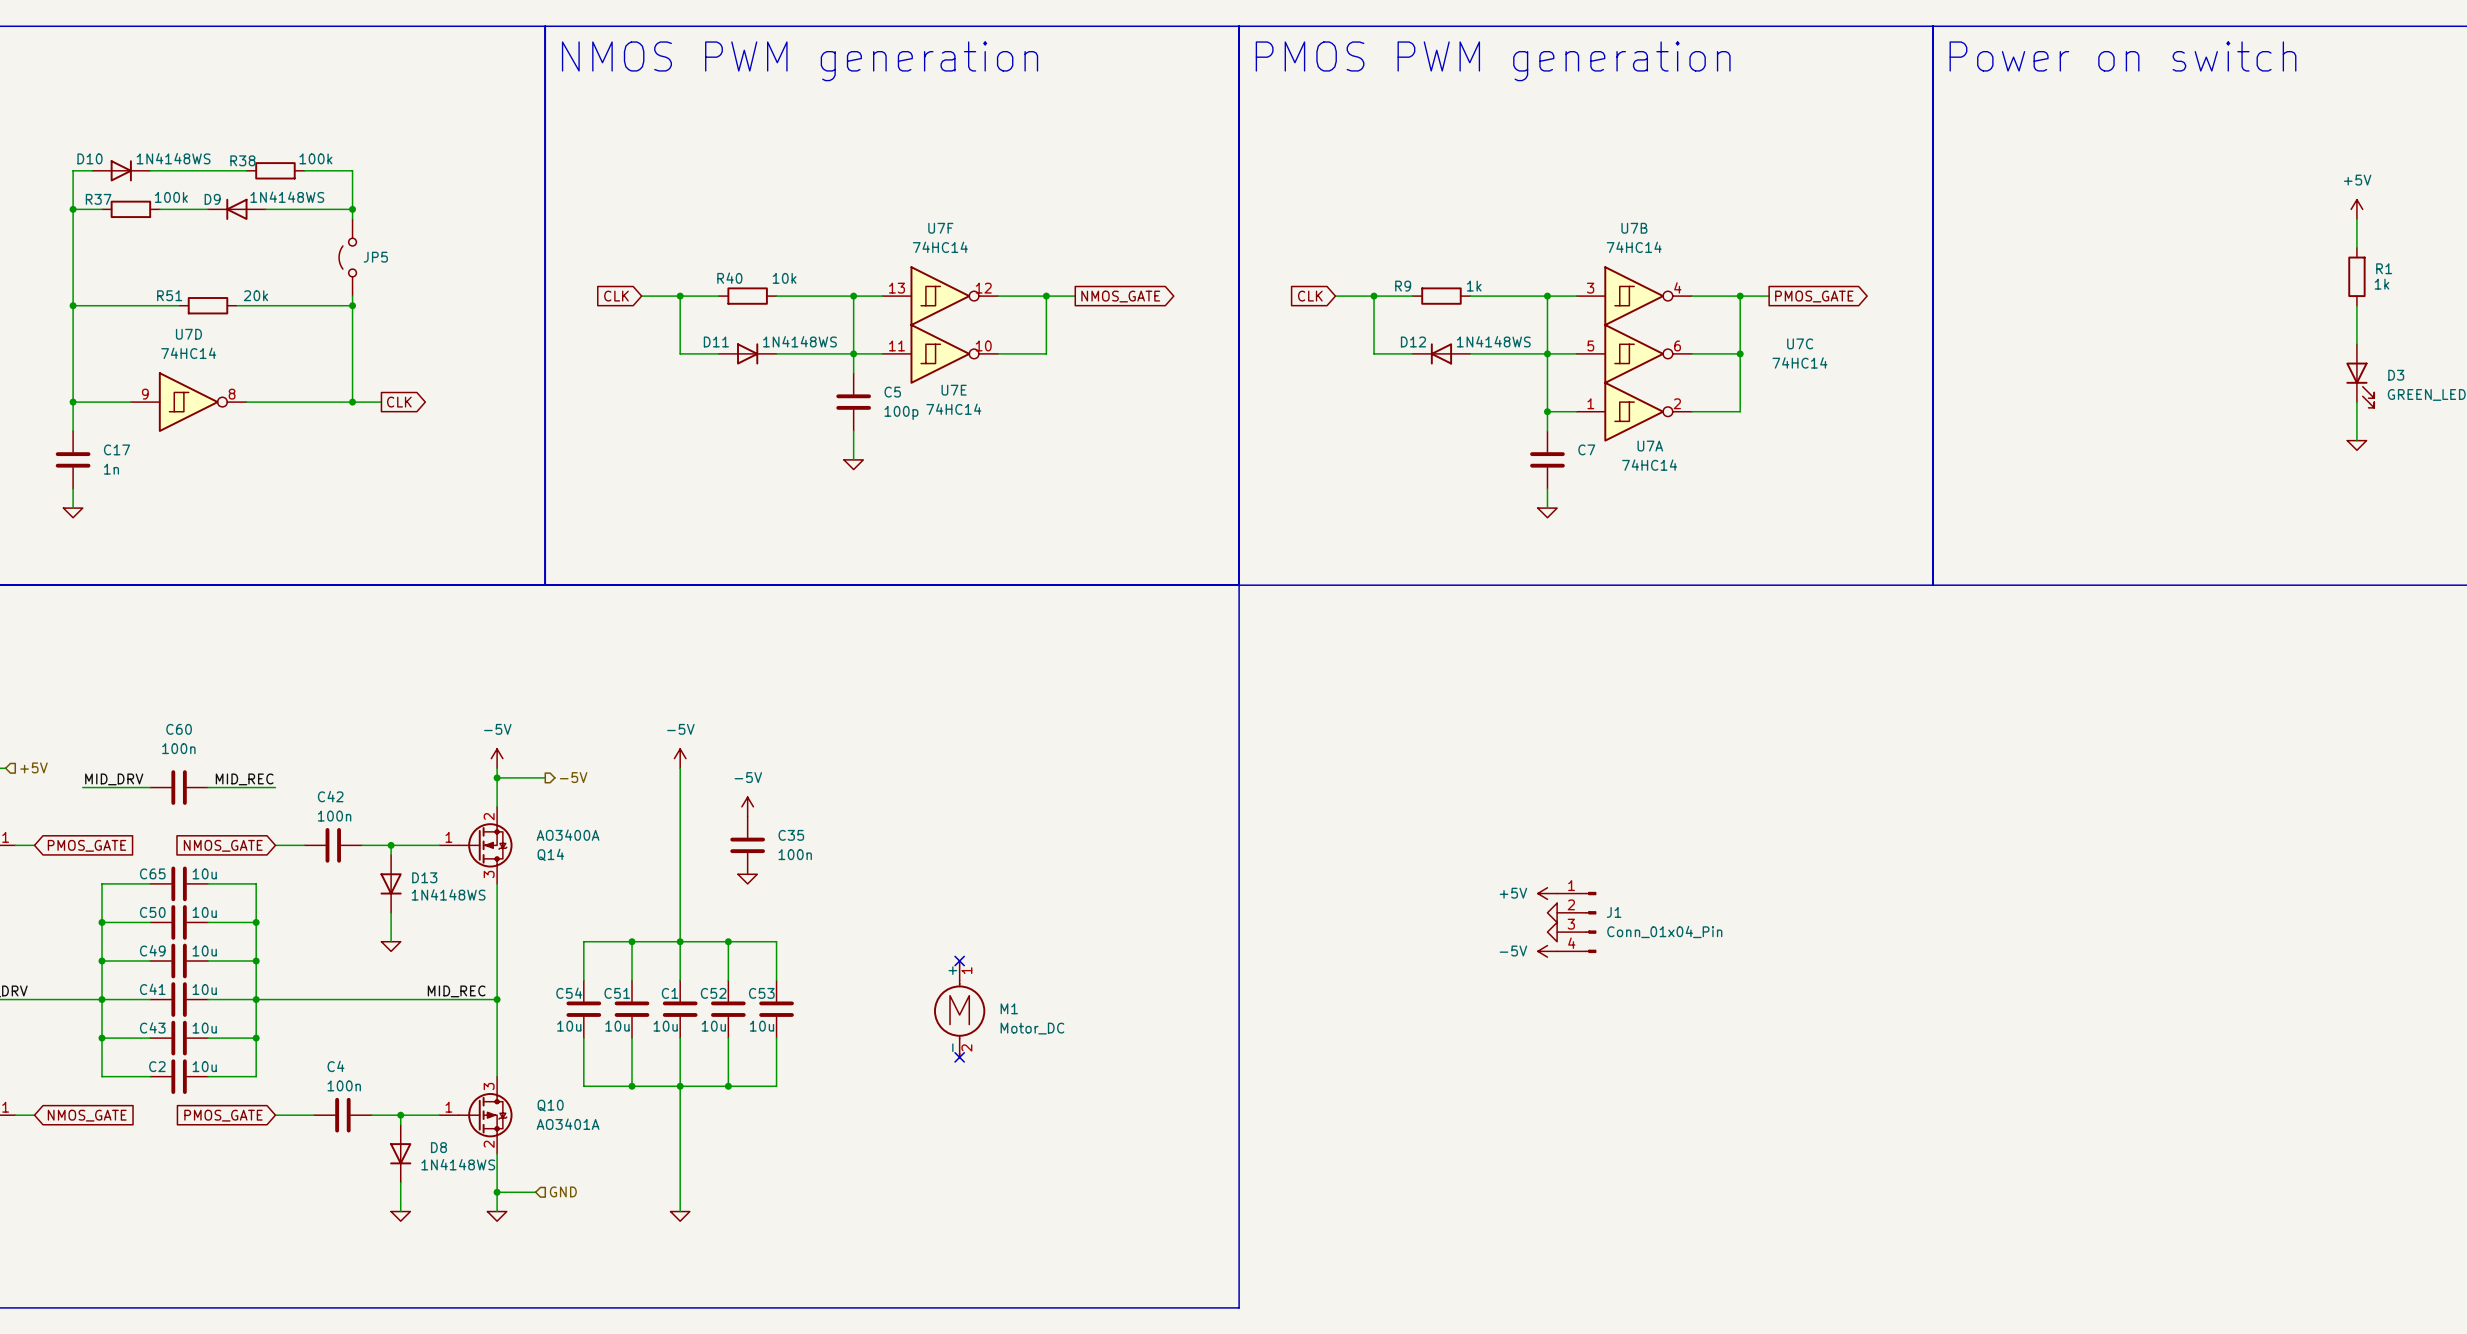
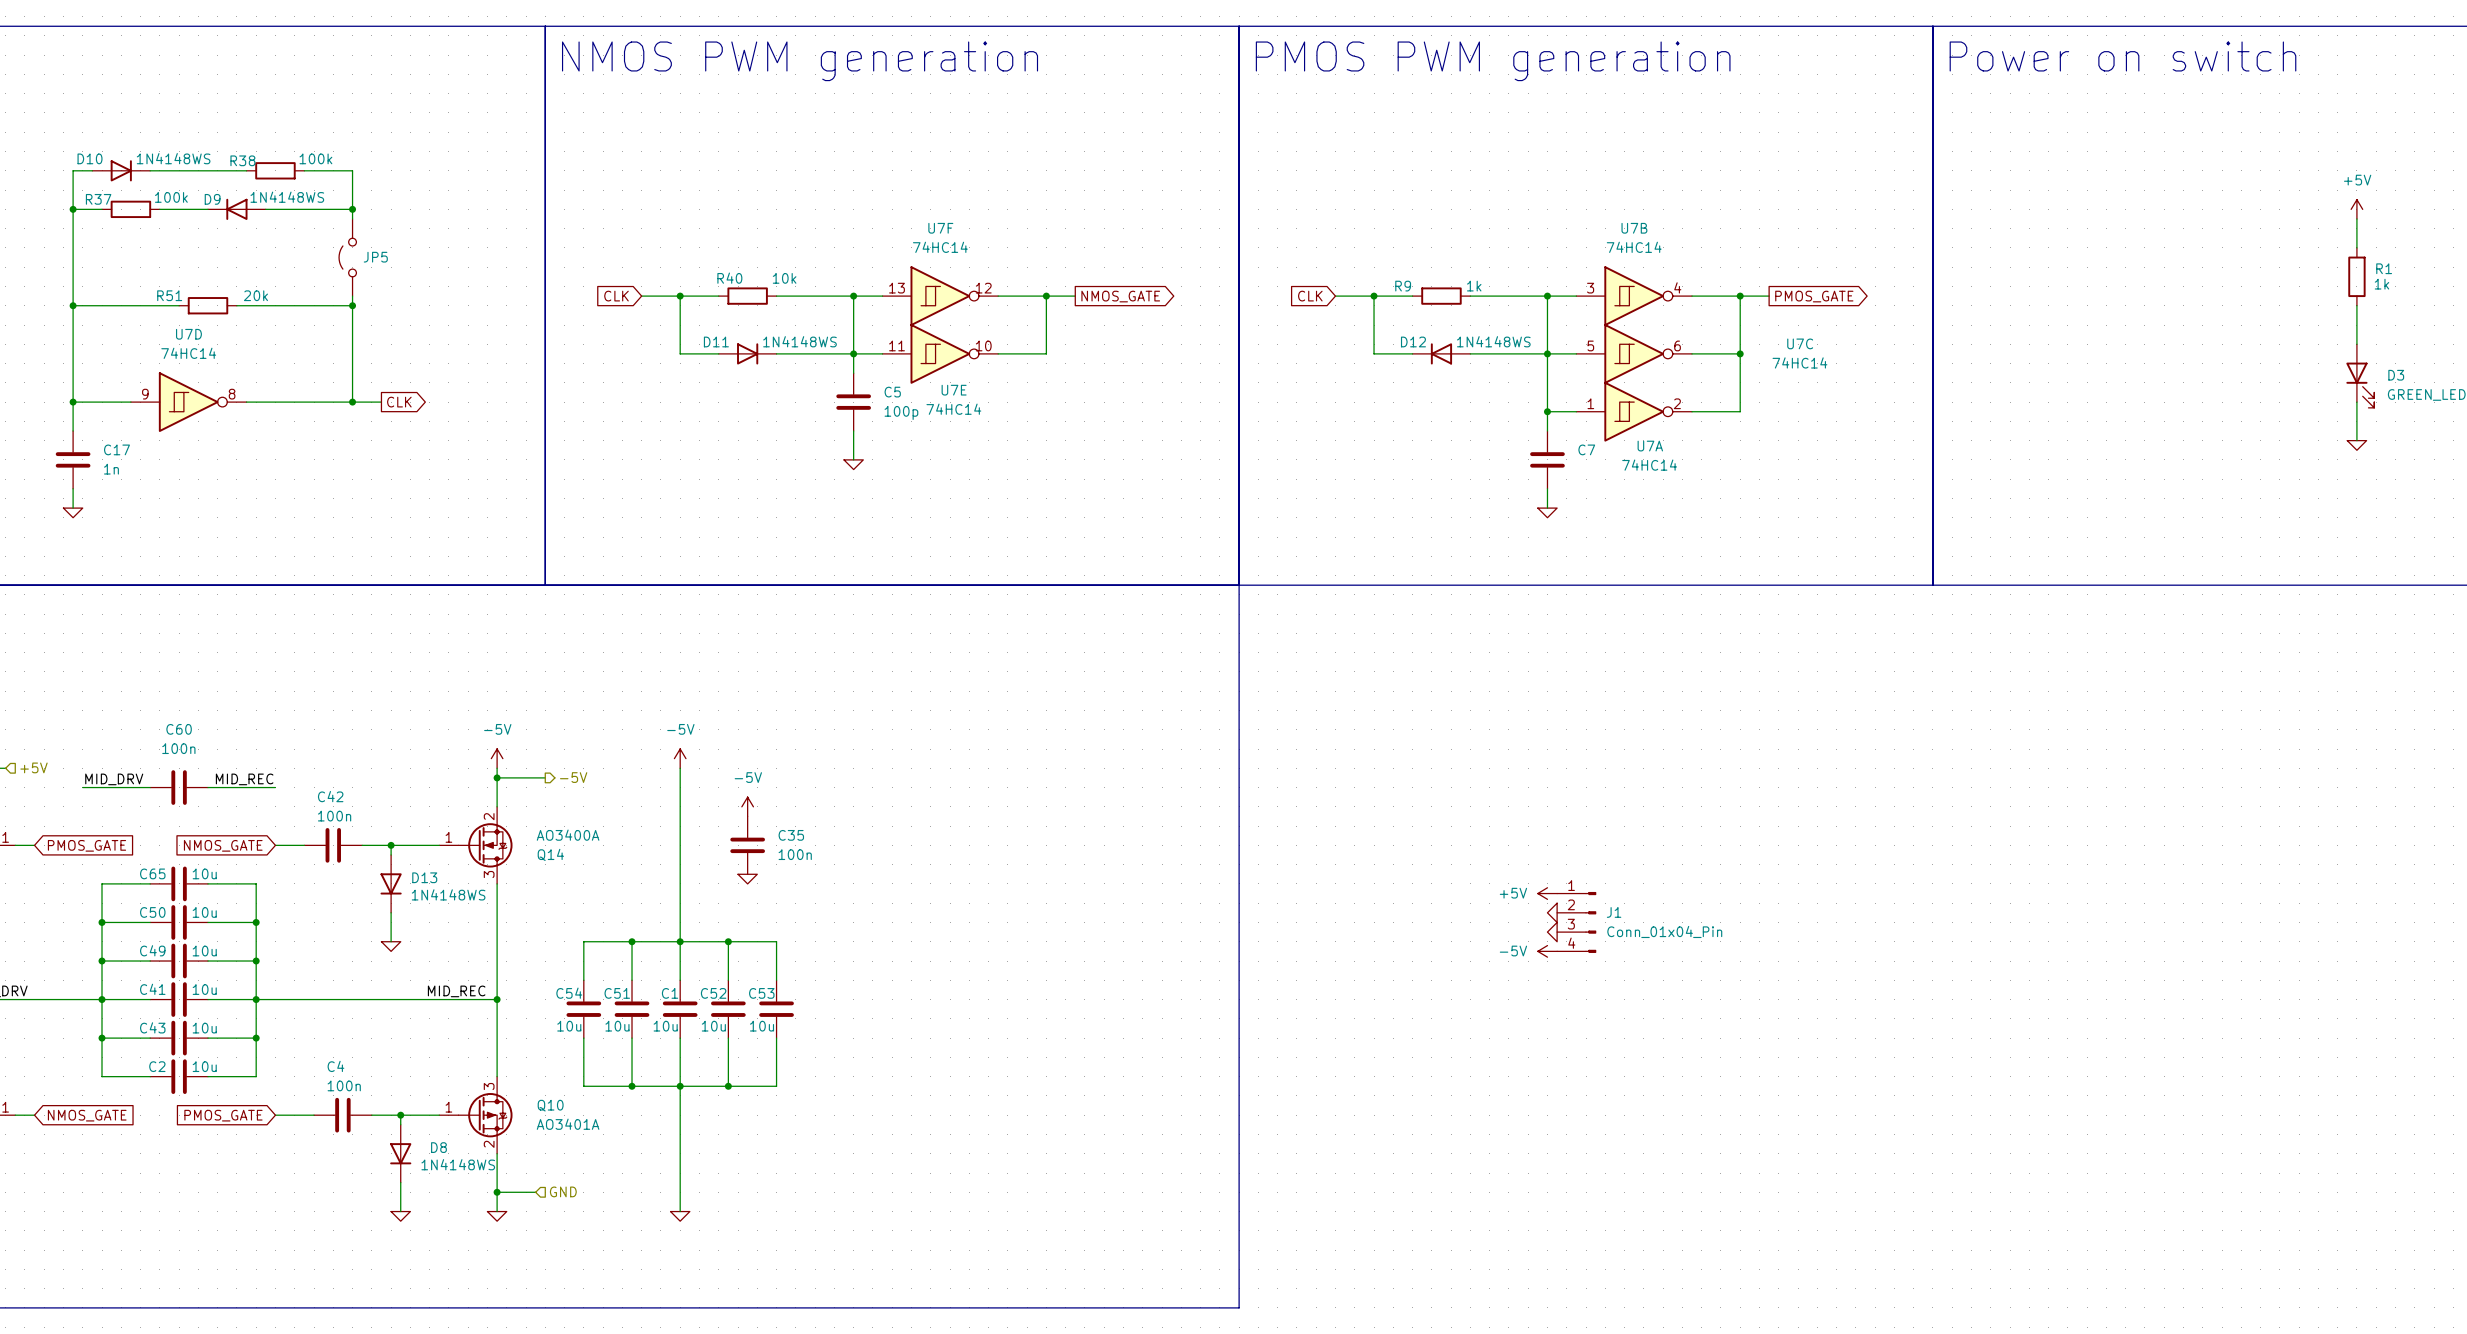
no-connect mark: (959, 961) -> none
M1: Motor_DC (959, 1009) -> none
no-connect mark: (959, 1057) -> none

